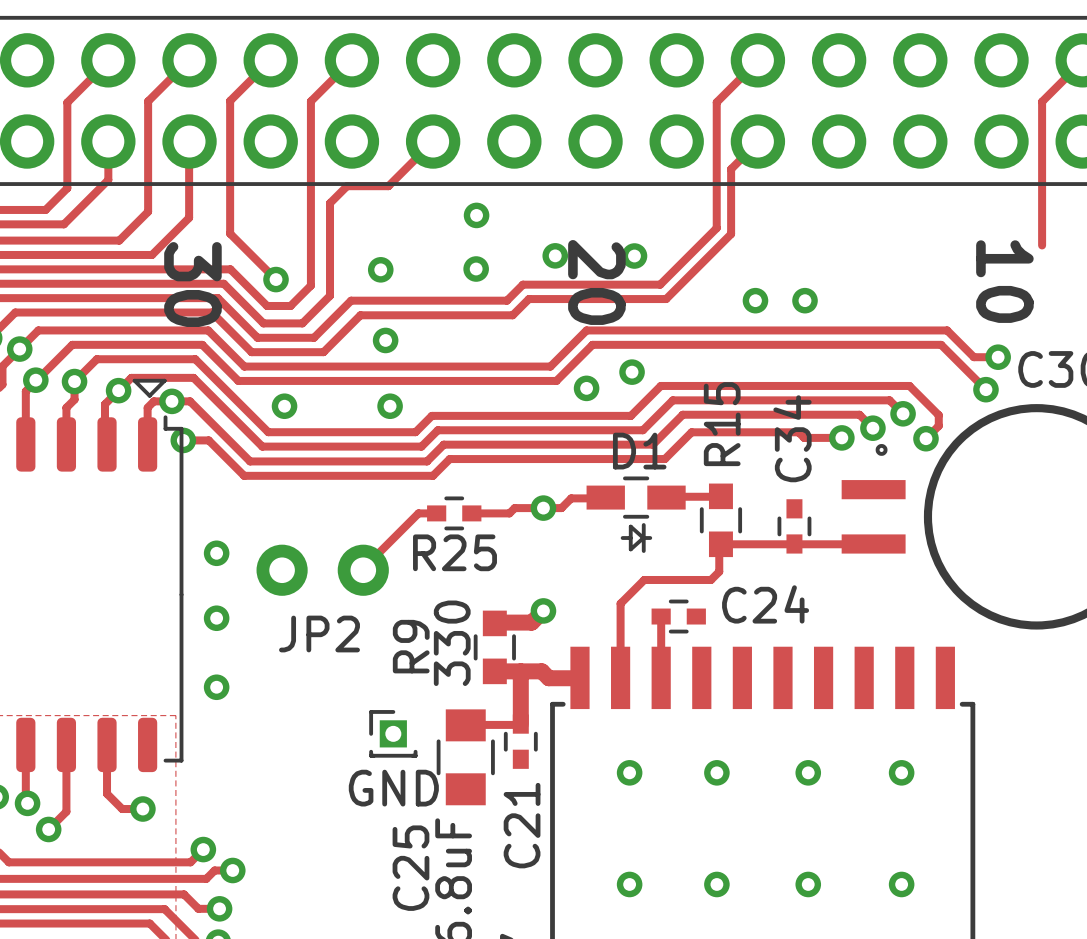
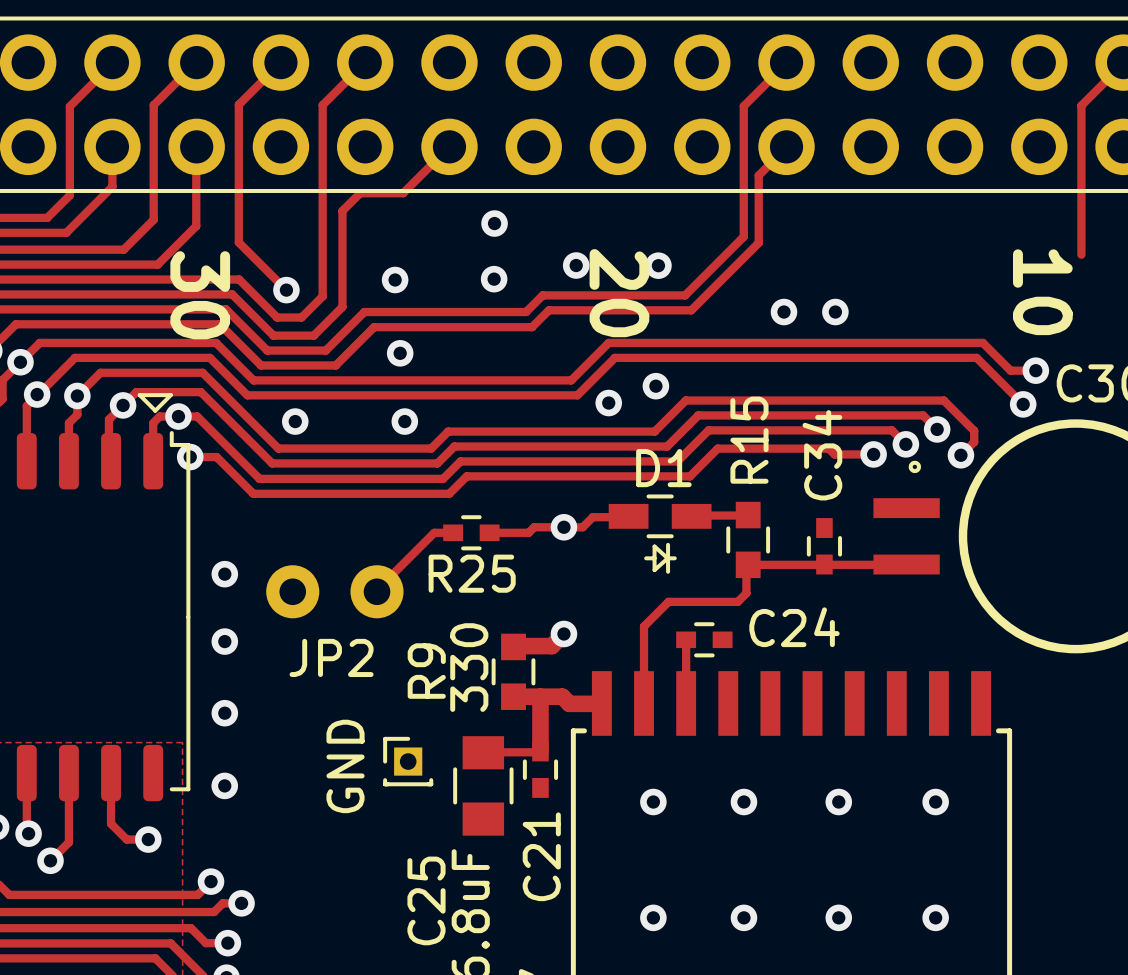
via: none -> (224, 785)
part value rotation: 0° (393, 788) -> 90° counterclockwise (345, 766)

